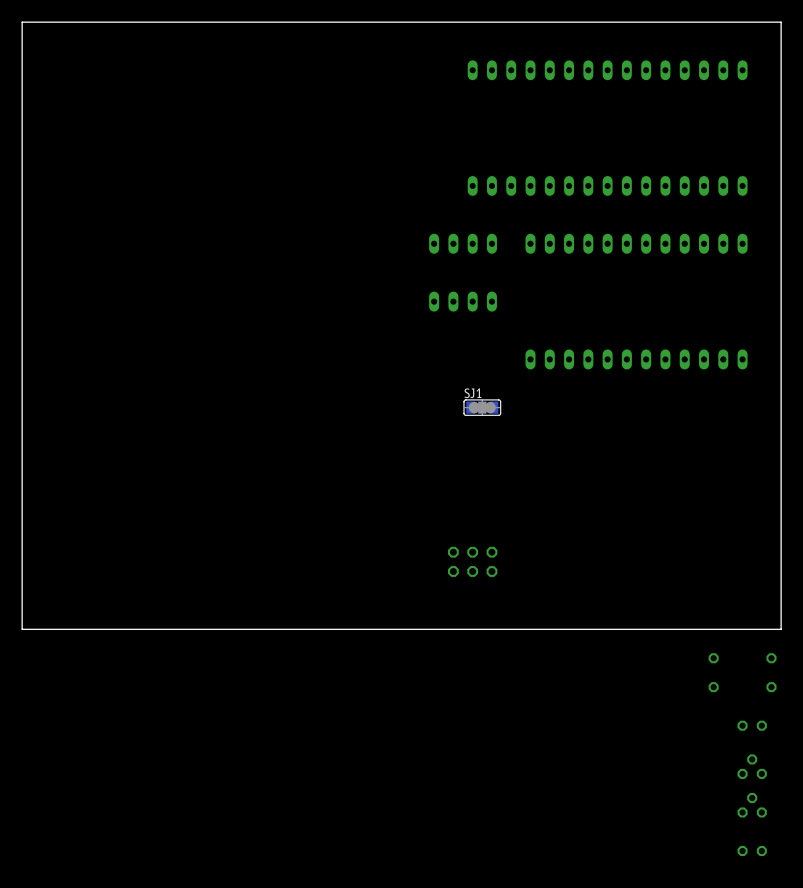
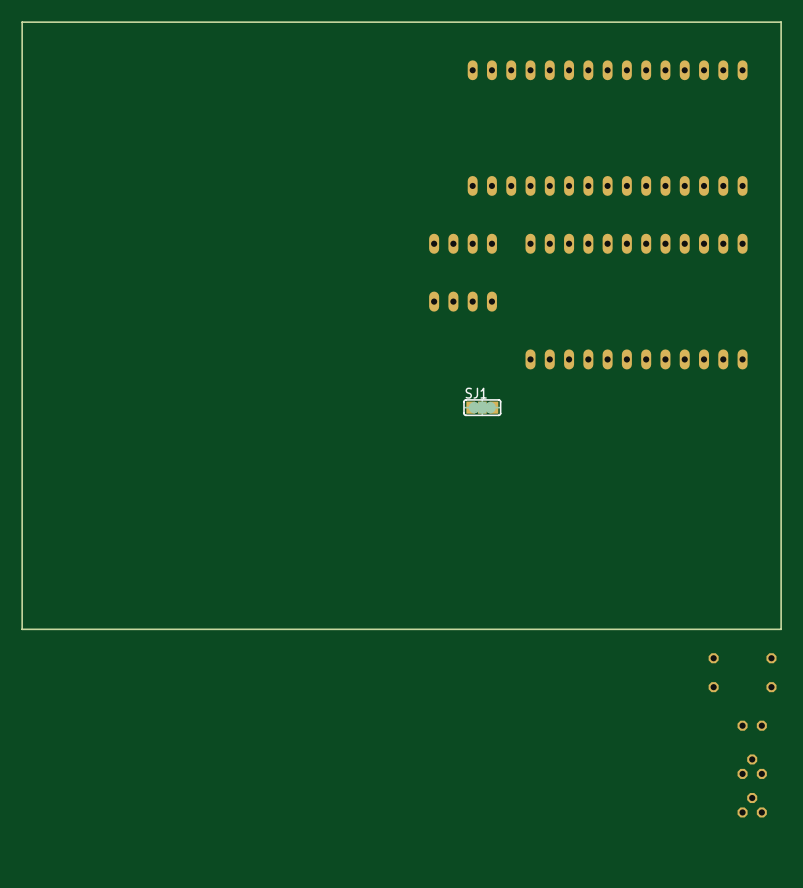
part: (472, 561) -> none
part: (752, 851) -> none

